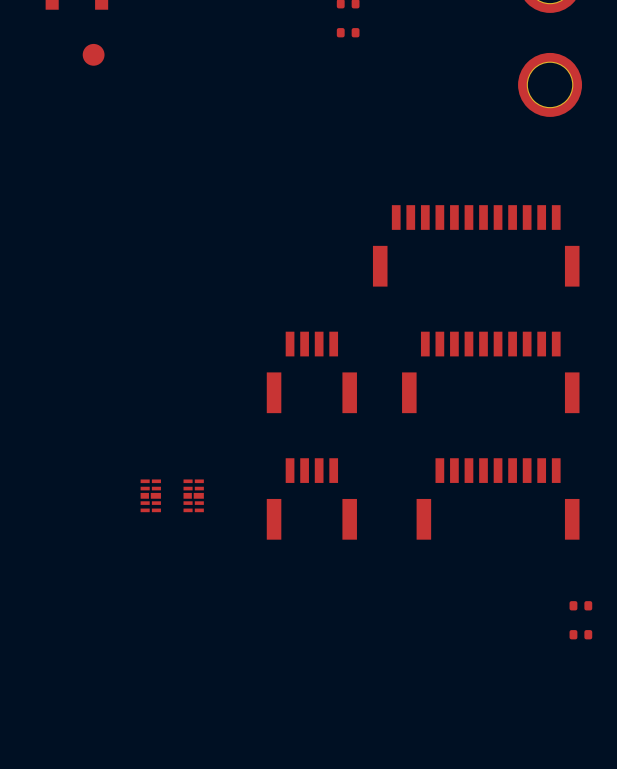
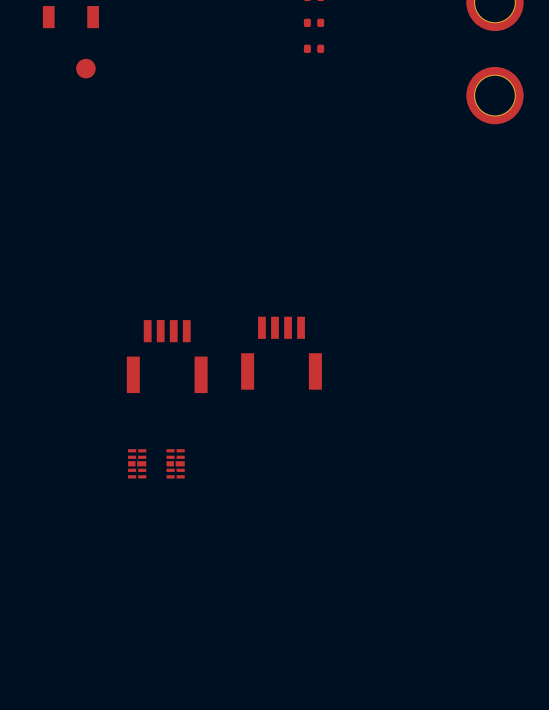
part: (476, 245) -> none
part: (490, 372) -> none
part position: (311, 498) -> (167, 356)
part: (498, 498) -> none
part: (580, 605) -> none
part: (580, 634) -> none

